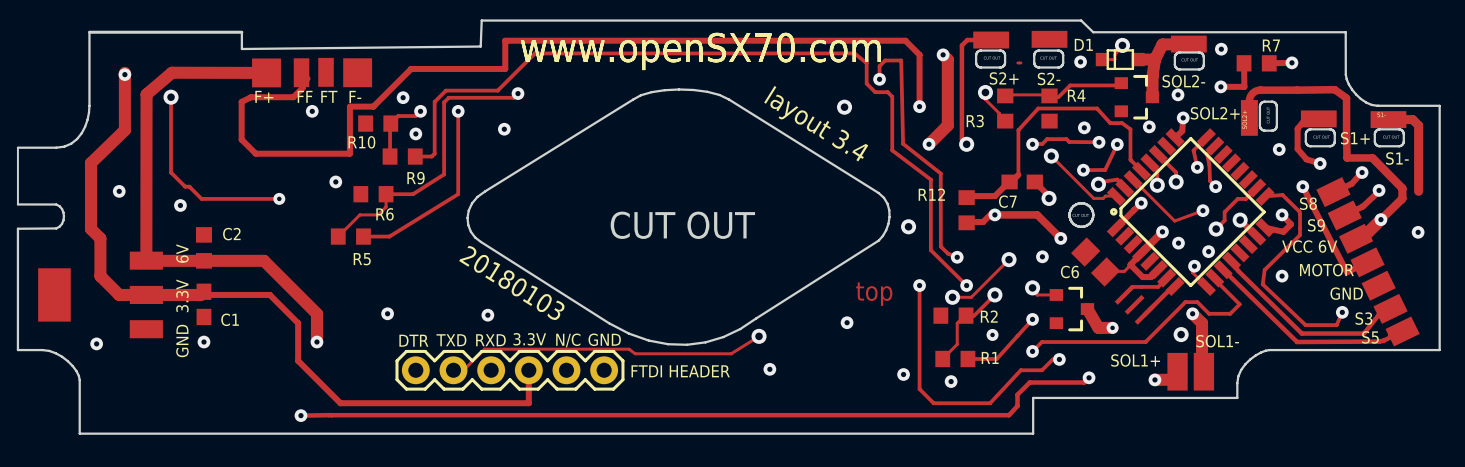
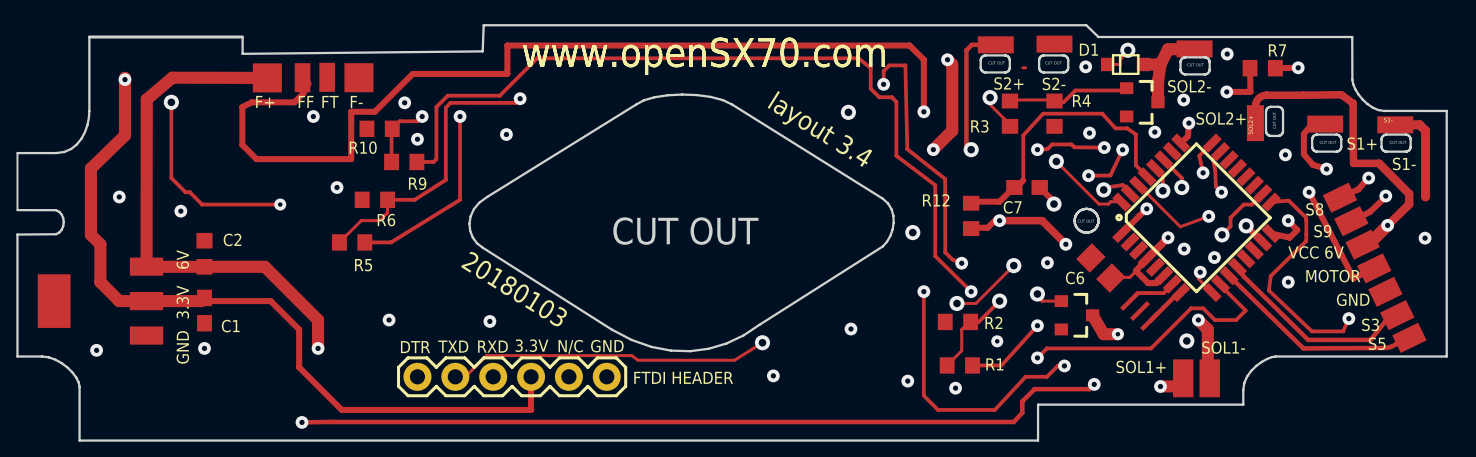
text: top (874, 294) -> none

